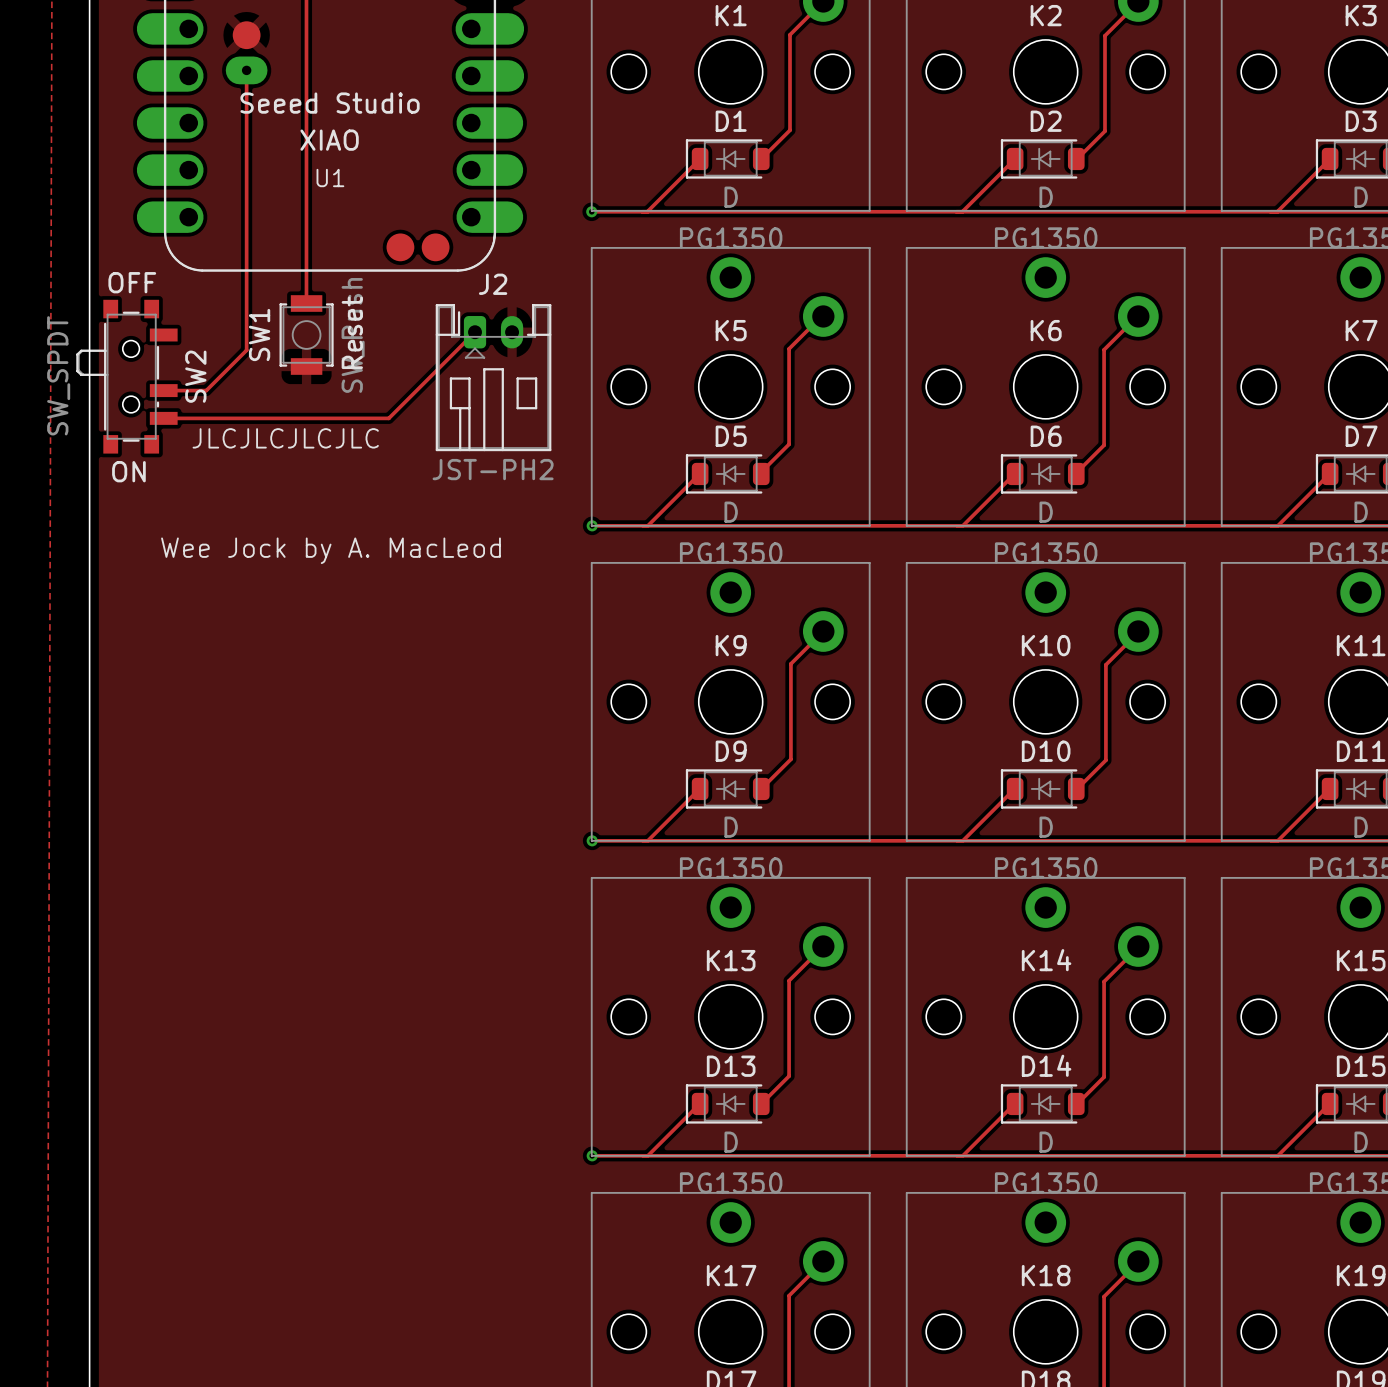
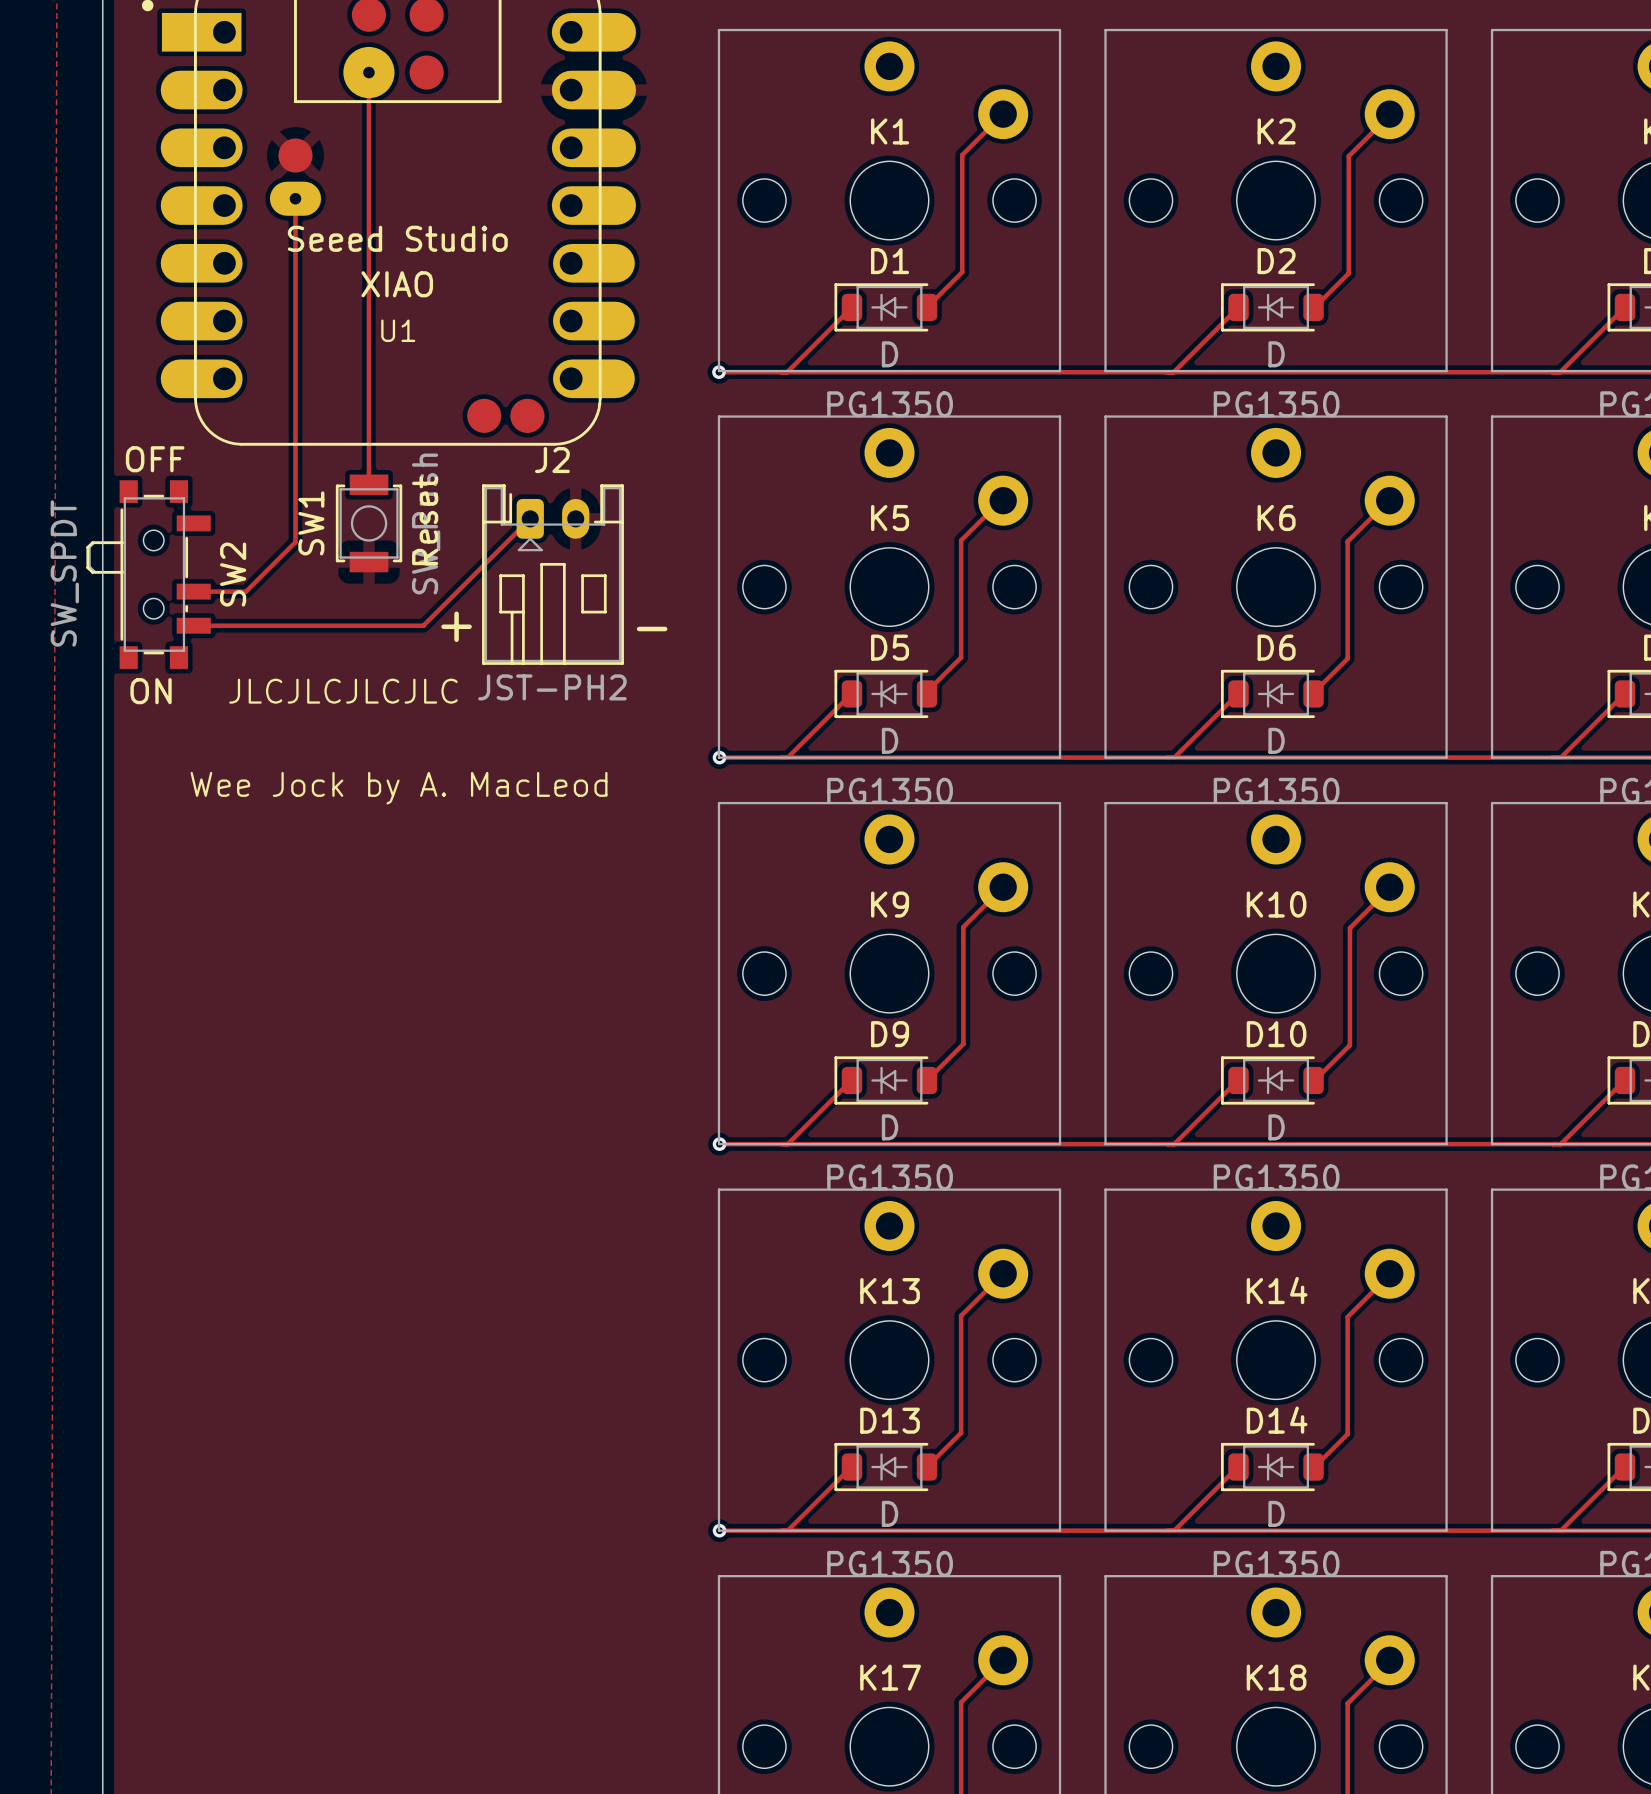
track: (475, 332) (388, 418) (350, 418) -> (530, 518) (423, 625)
J2 position: (493, 377) -> (552, 574)
text: none -> + (456, 626)
text: none -> - (652, 629)
text position: JLCJLCJLCJLC (285, 438) -> JLCJLCJLCJLC (343, 691)

